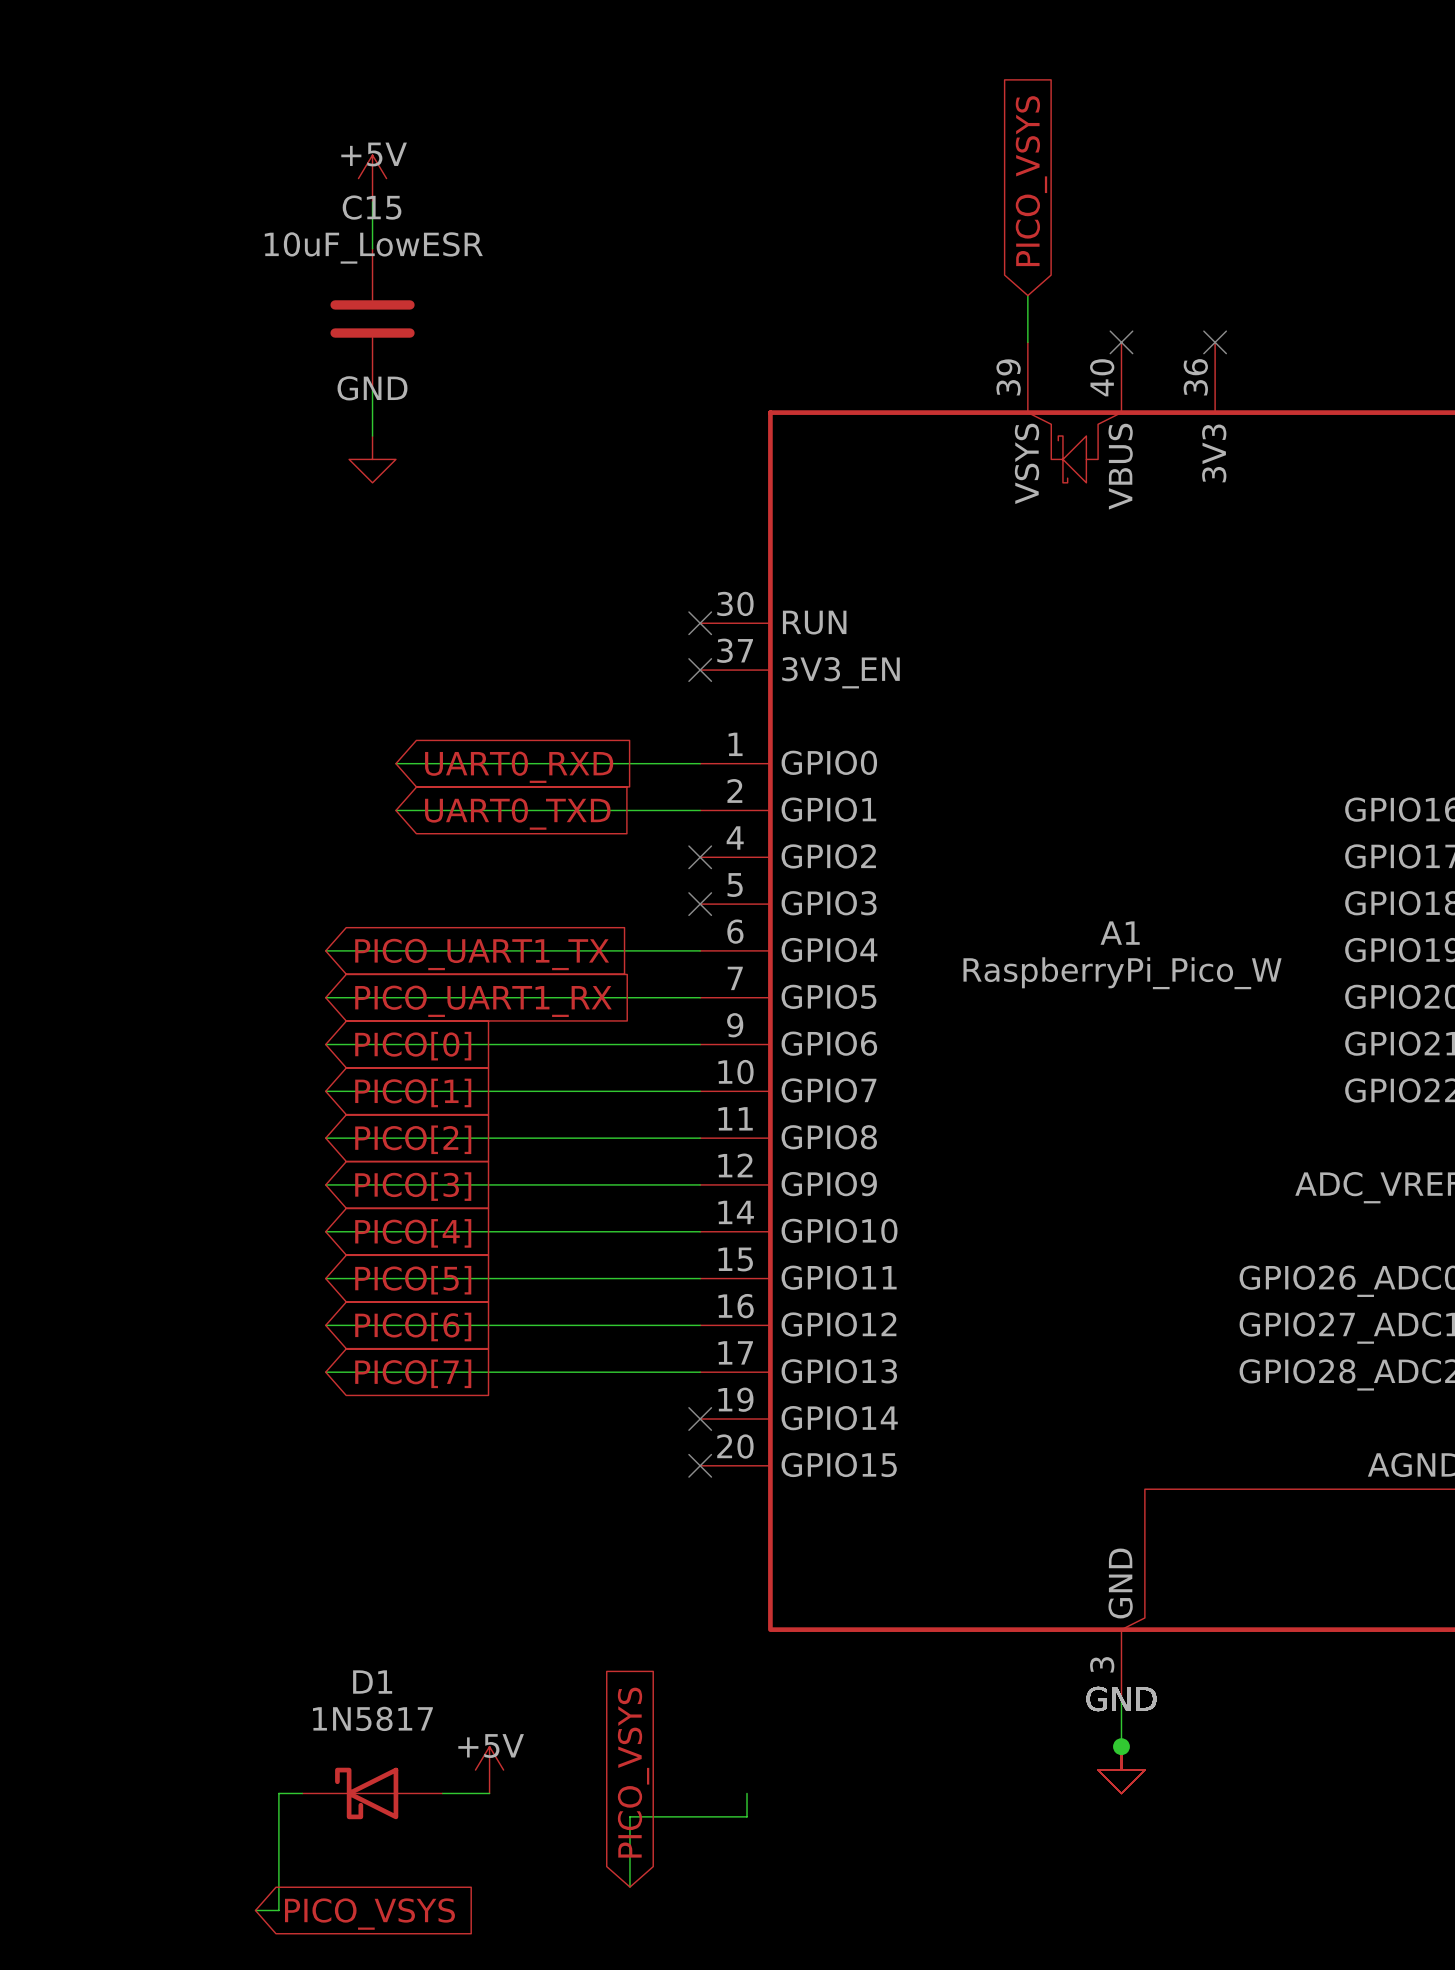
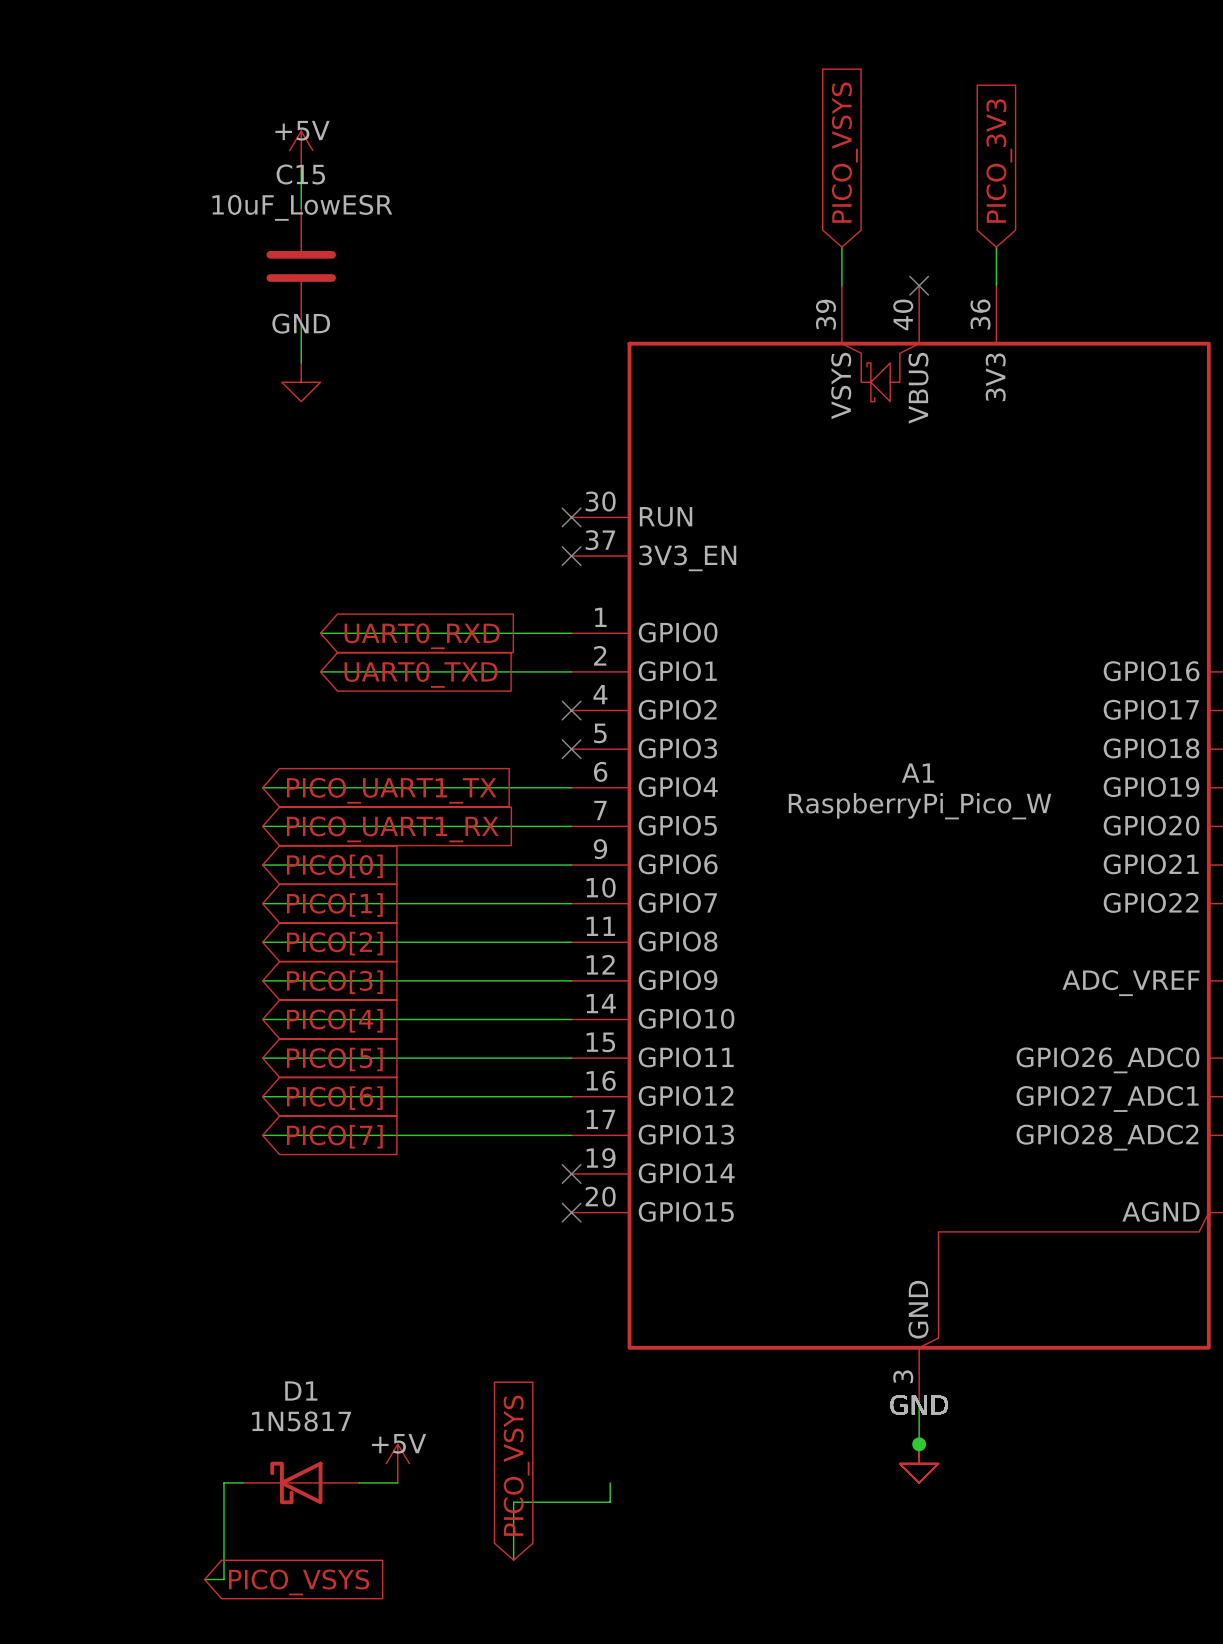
global label: none -> PICO_3V3 (999, 161)
wire: none -> (996, 247) (996, 285)
no-connect mark: (1215, 342) -> none

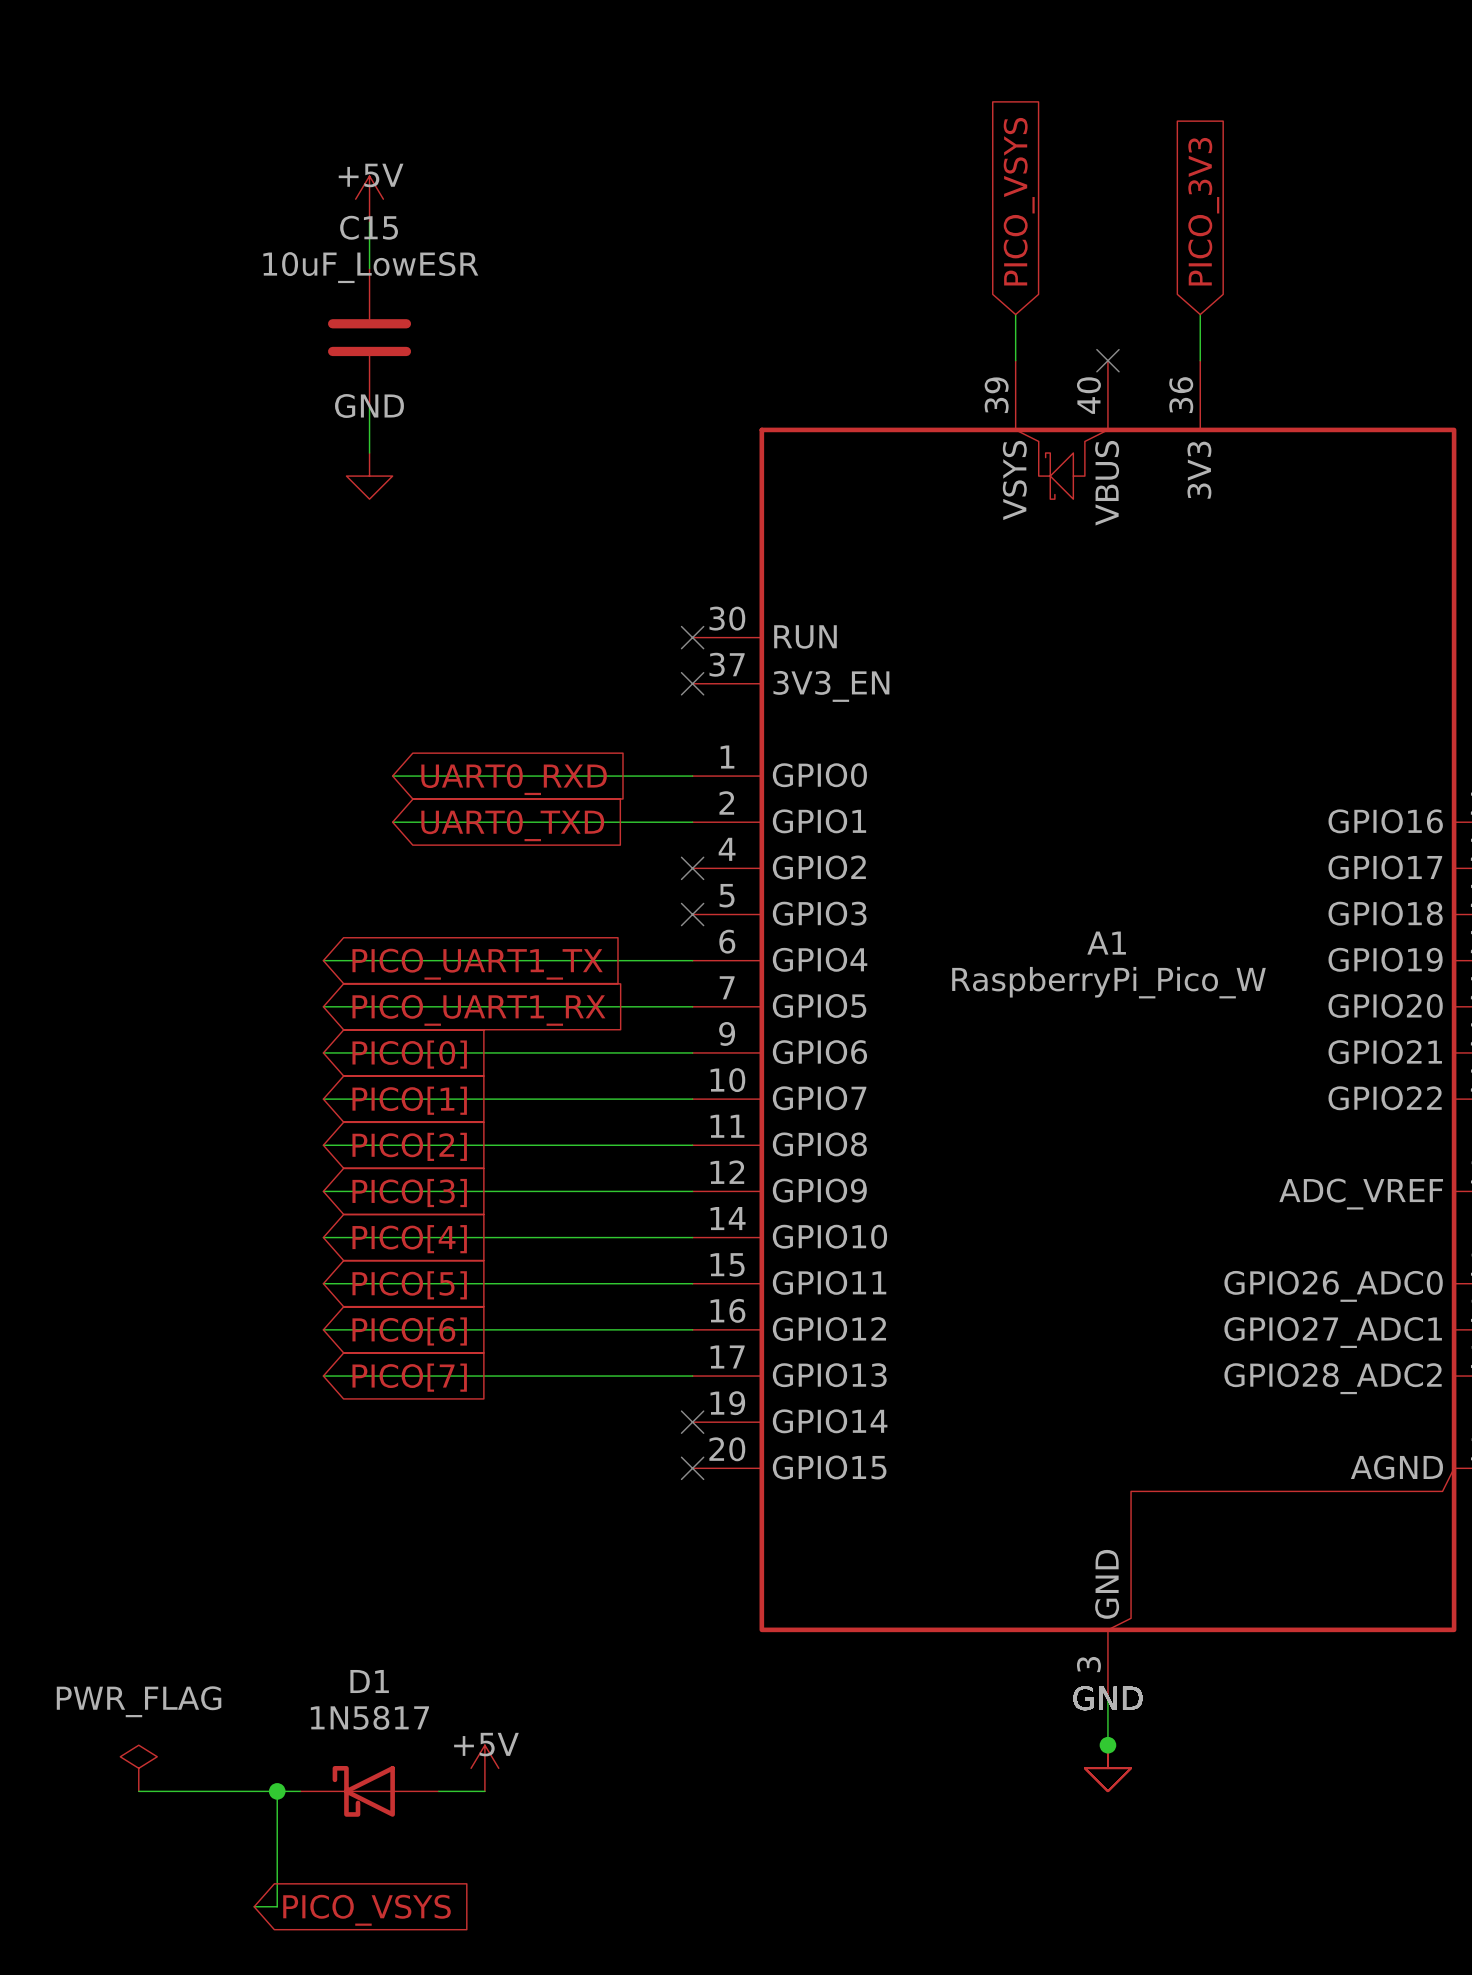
power symbol: none -> PWR_FLAG (138, 1768)
global label: PICO_VSYS (516, 1465) -> none
wire: none -> (138, 1791) (277, 1791)
junction: none -> (277, 1791)
wire: (610, 1482) (610, 1502) (513, 1502) (513, 1560) -> none

